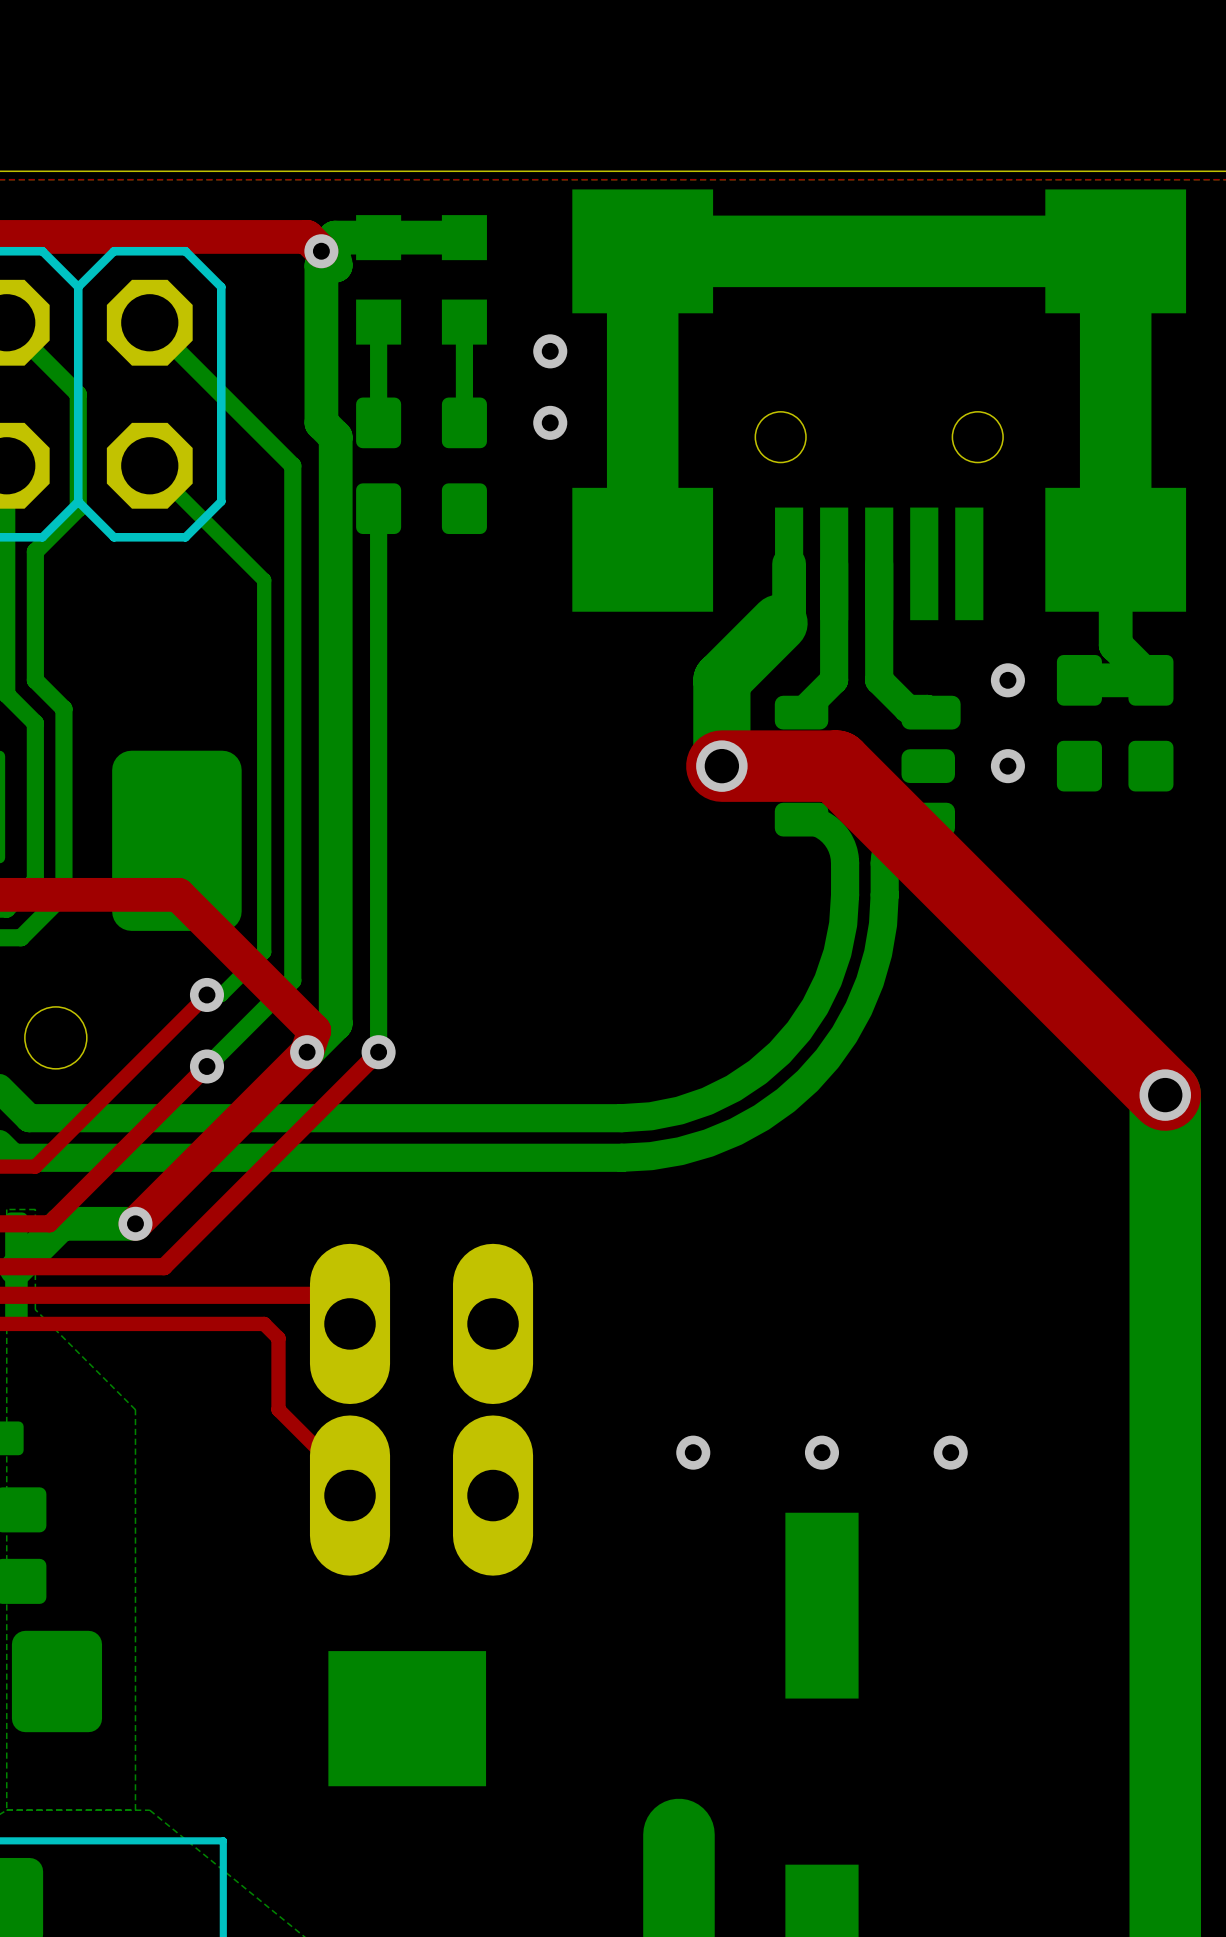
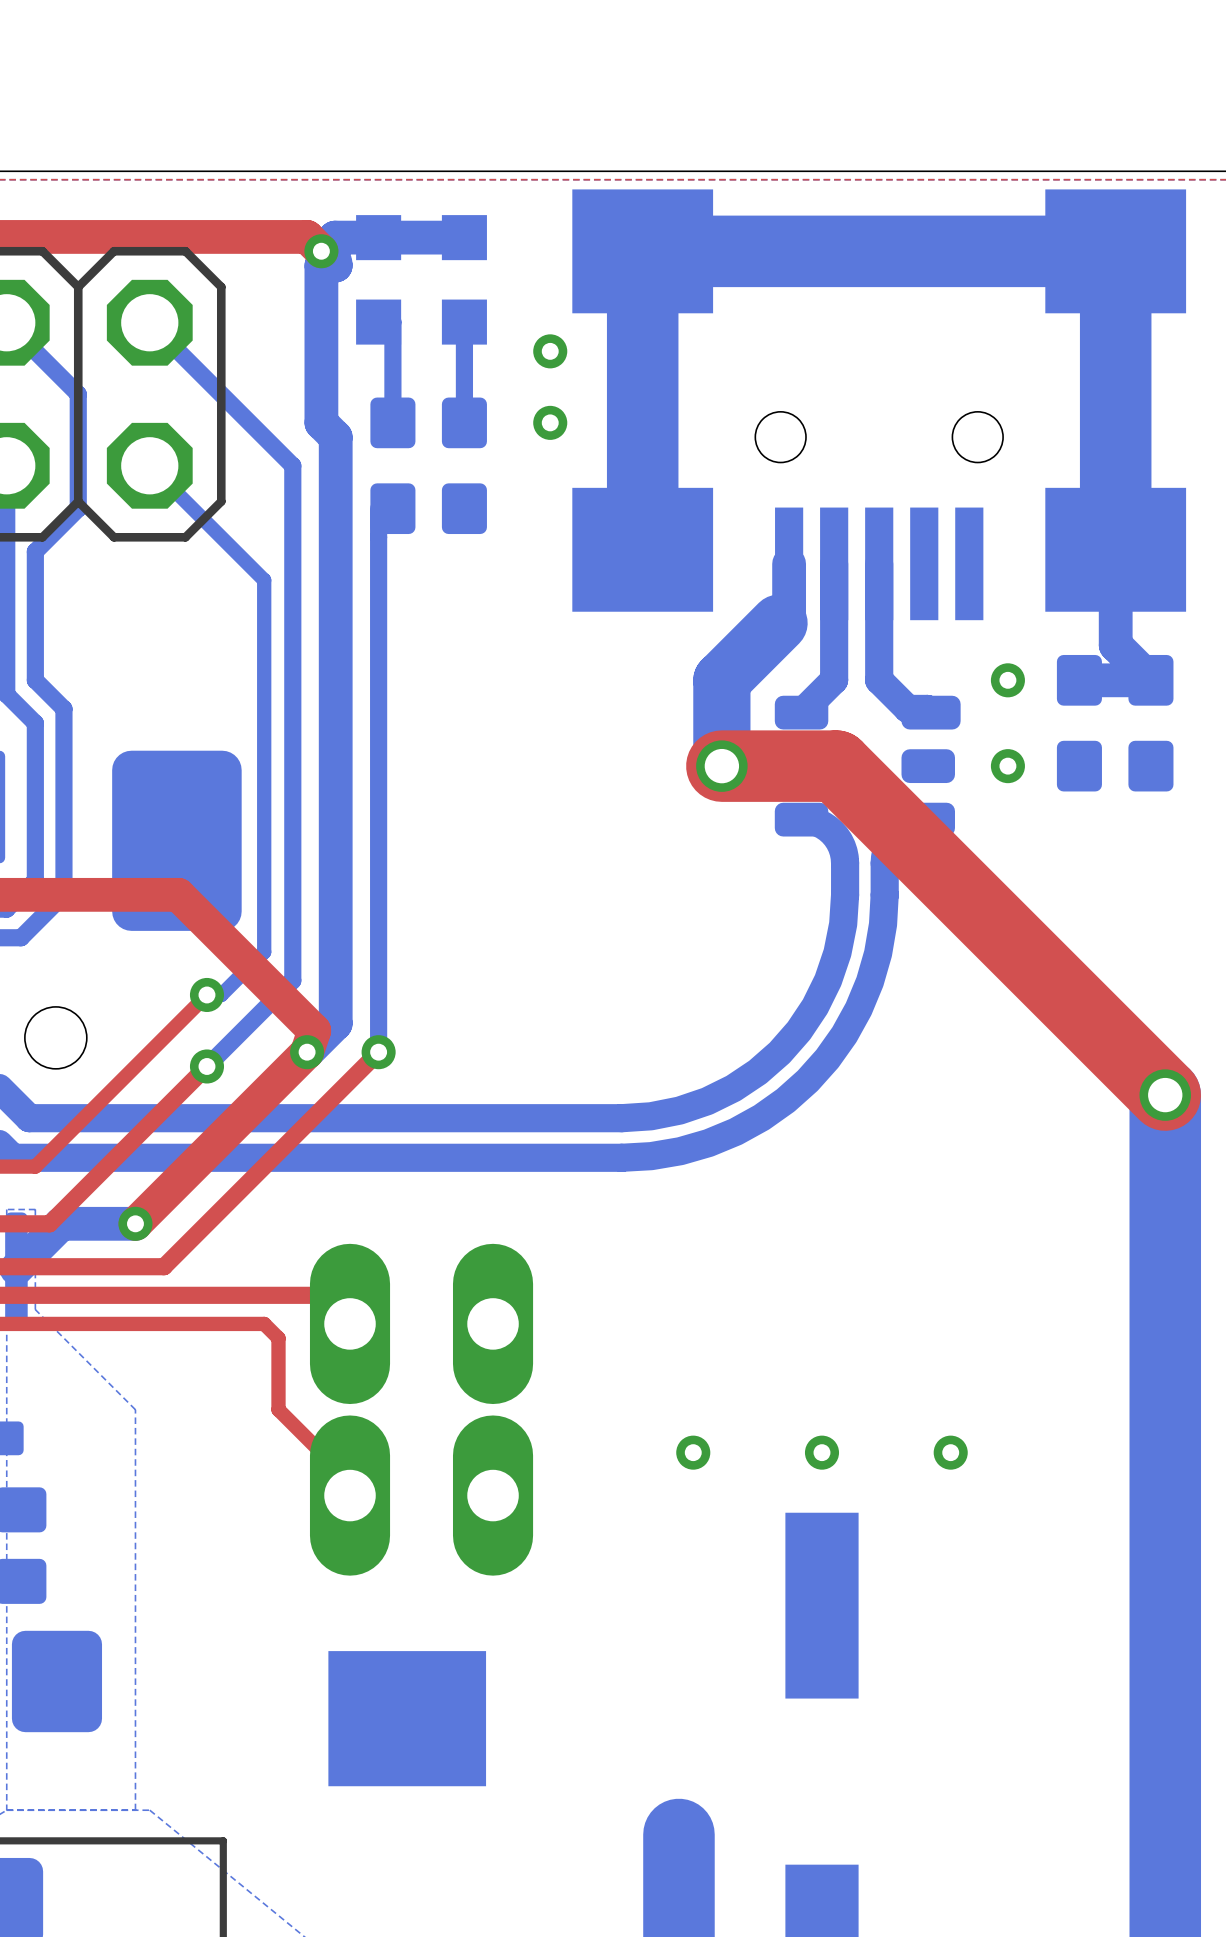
bottom track: (378, 322) (378, 422) -> (378, 322) (392, 322) (392, 422)
part position: (378, 465) -> (392, 465)

